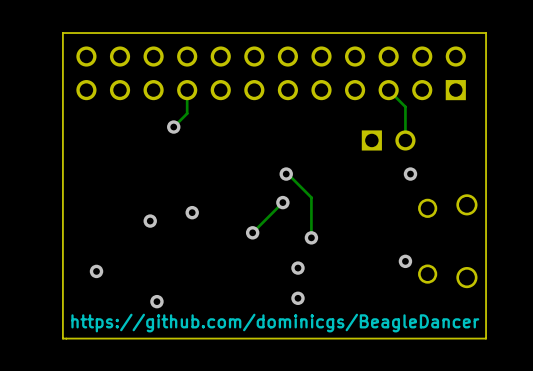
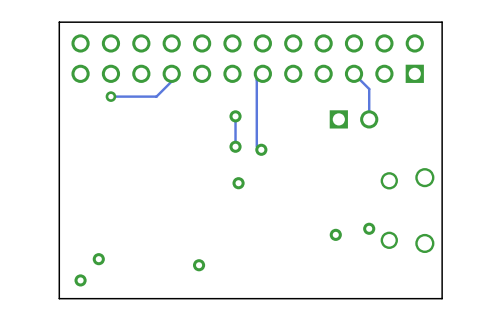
track: none -> (262, 73) (256, 79) (256, 146)
track: (187, 98) (187, 113) (173, 127) -> (171, 81) (156, 96) (110, 96)
via: none -> (110, 96)
via: (173, 127) -> none
track: none -> (235, 116) (235, 146)
via: none -> (235, 116)
via: none -> (235, 146)
track: (286, 174) (311, 197) (311, 237) -> none
via: (410, 174) -> none
track: (282, 202) (252, 232) -> none
via: (282, 202) -> none
via: none -> (238, 183)
via: (192, 212) -> none
via: (150, 221) -> none
via: (252, 232) -> none
via: (311, 237) -> none
via: (297, 268) -> none
via: none -> (335, 234)
via: (96, 271) -> none
via: none -> (98, 259)
via: (297, 298) -> none
via: (156, 301) -> none
via: none -> (199, 265)
via: none -> (80, 280)
text: https://github.com/dominicgs/BeagleDancer (275, 323) -> none

